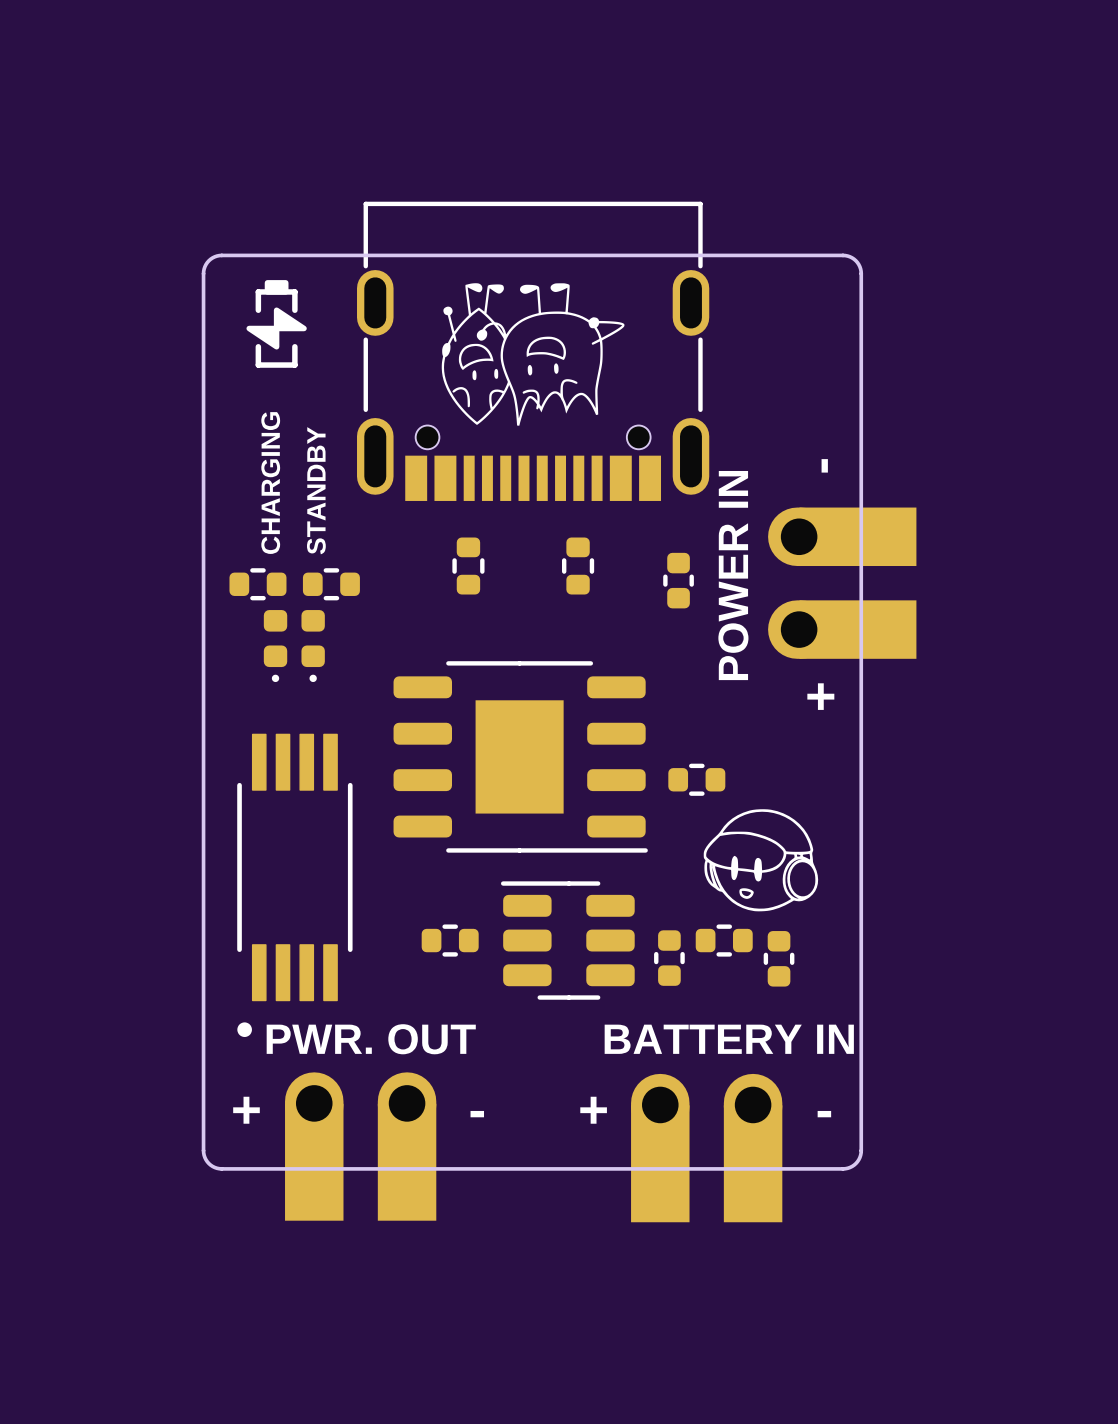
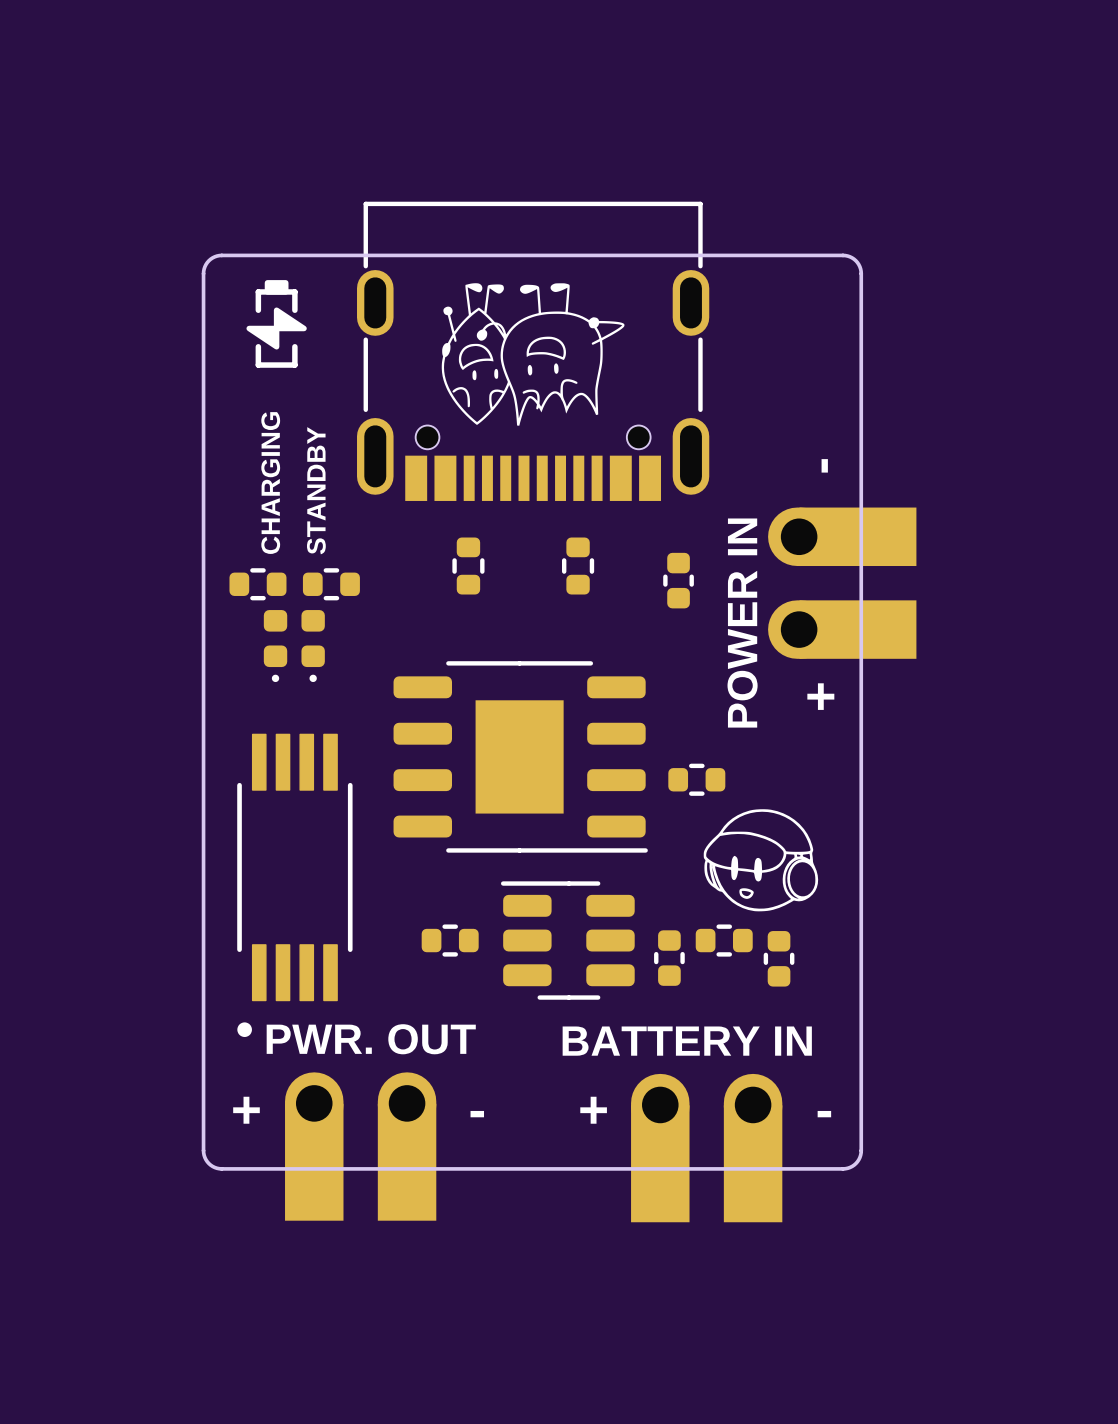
text position: POWER IN (733, 575) -> POWER IN (742, 623)
text position: BATTERY IN (729, 1039) -> BATTERY IN (687, 1041)

